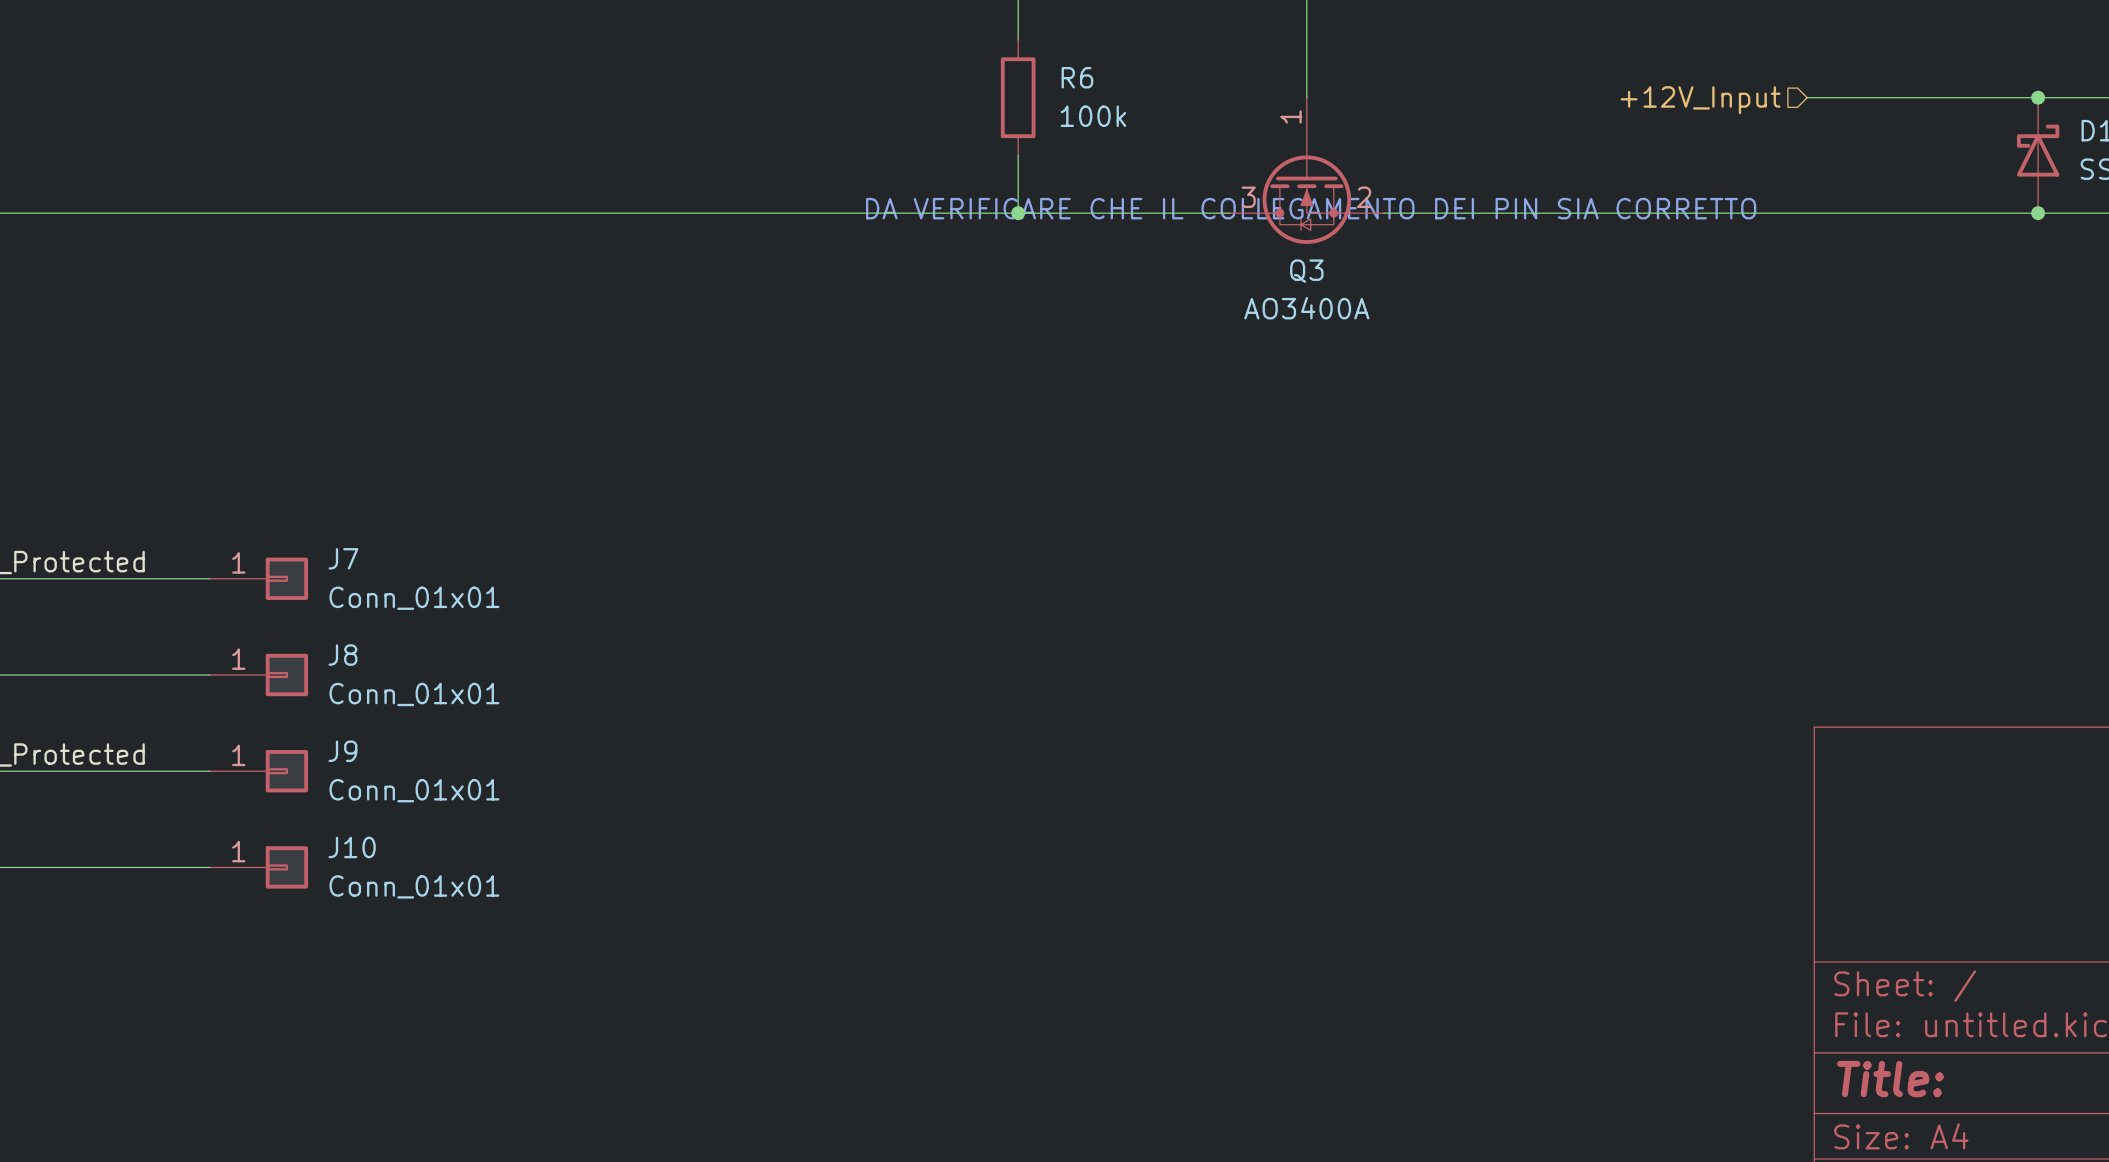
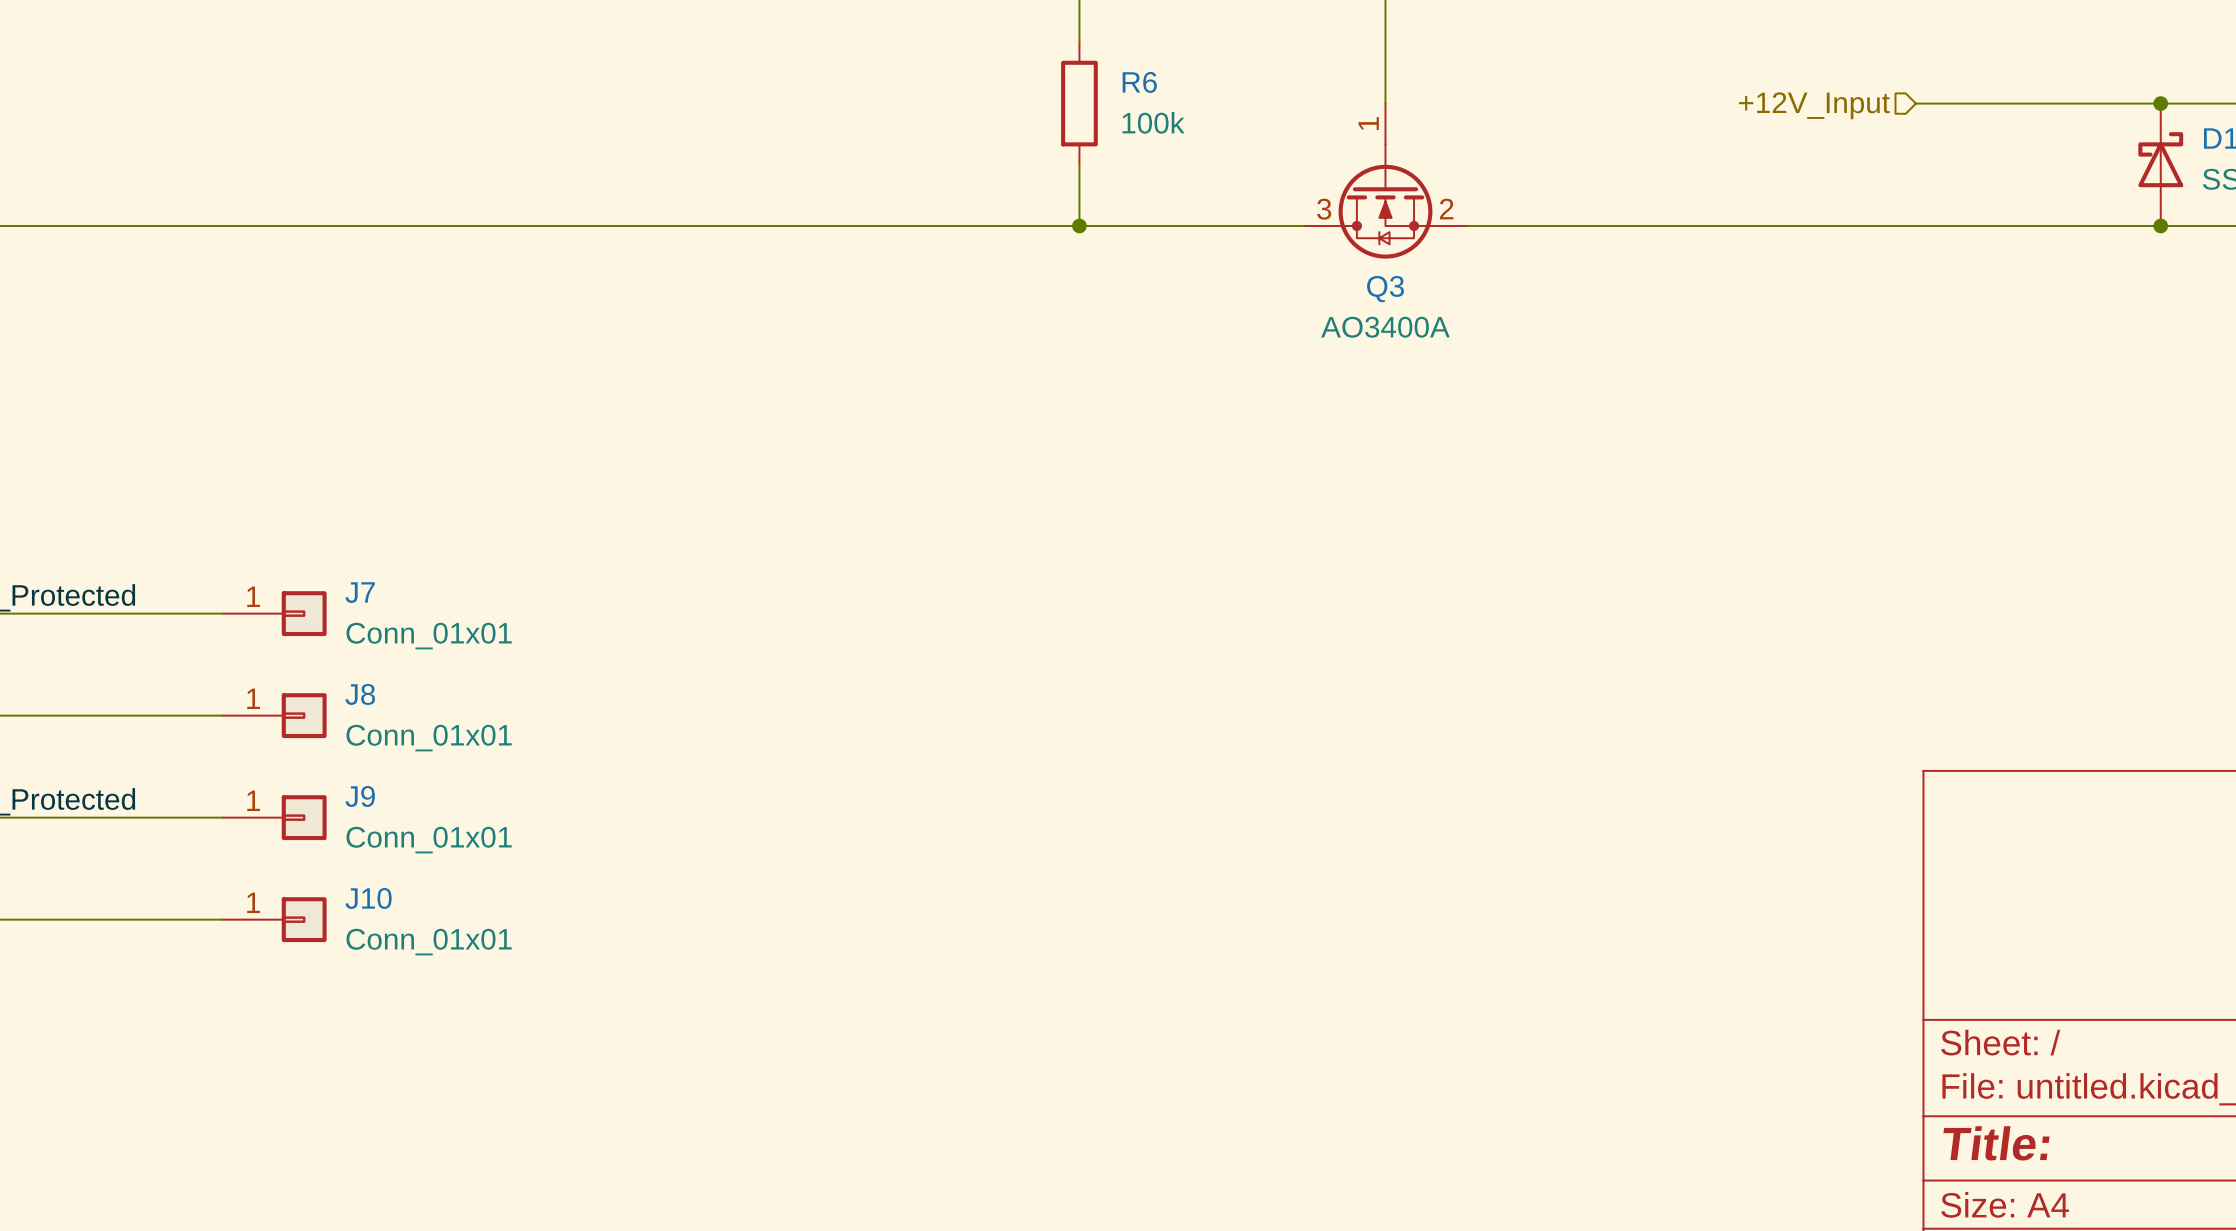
text: DA VERIFICARE CHE IL COLLEGAMENTO DEI PIN SIA CORRETTO (1311, 208) -> none

